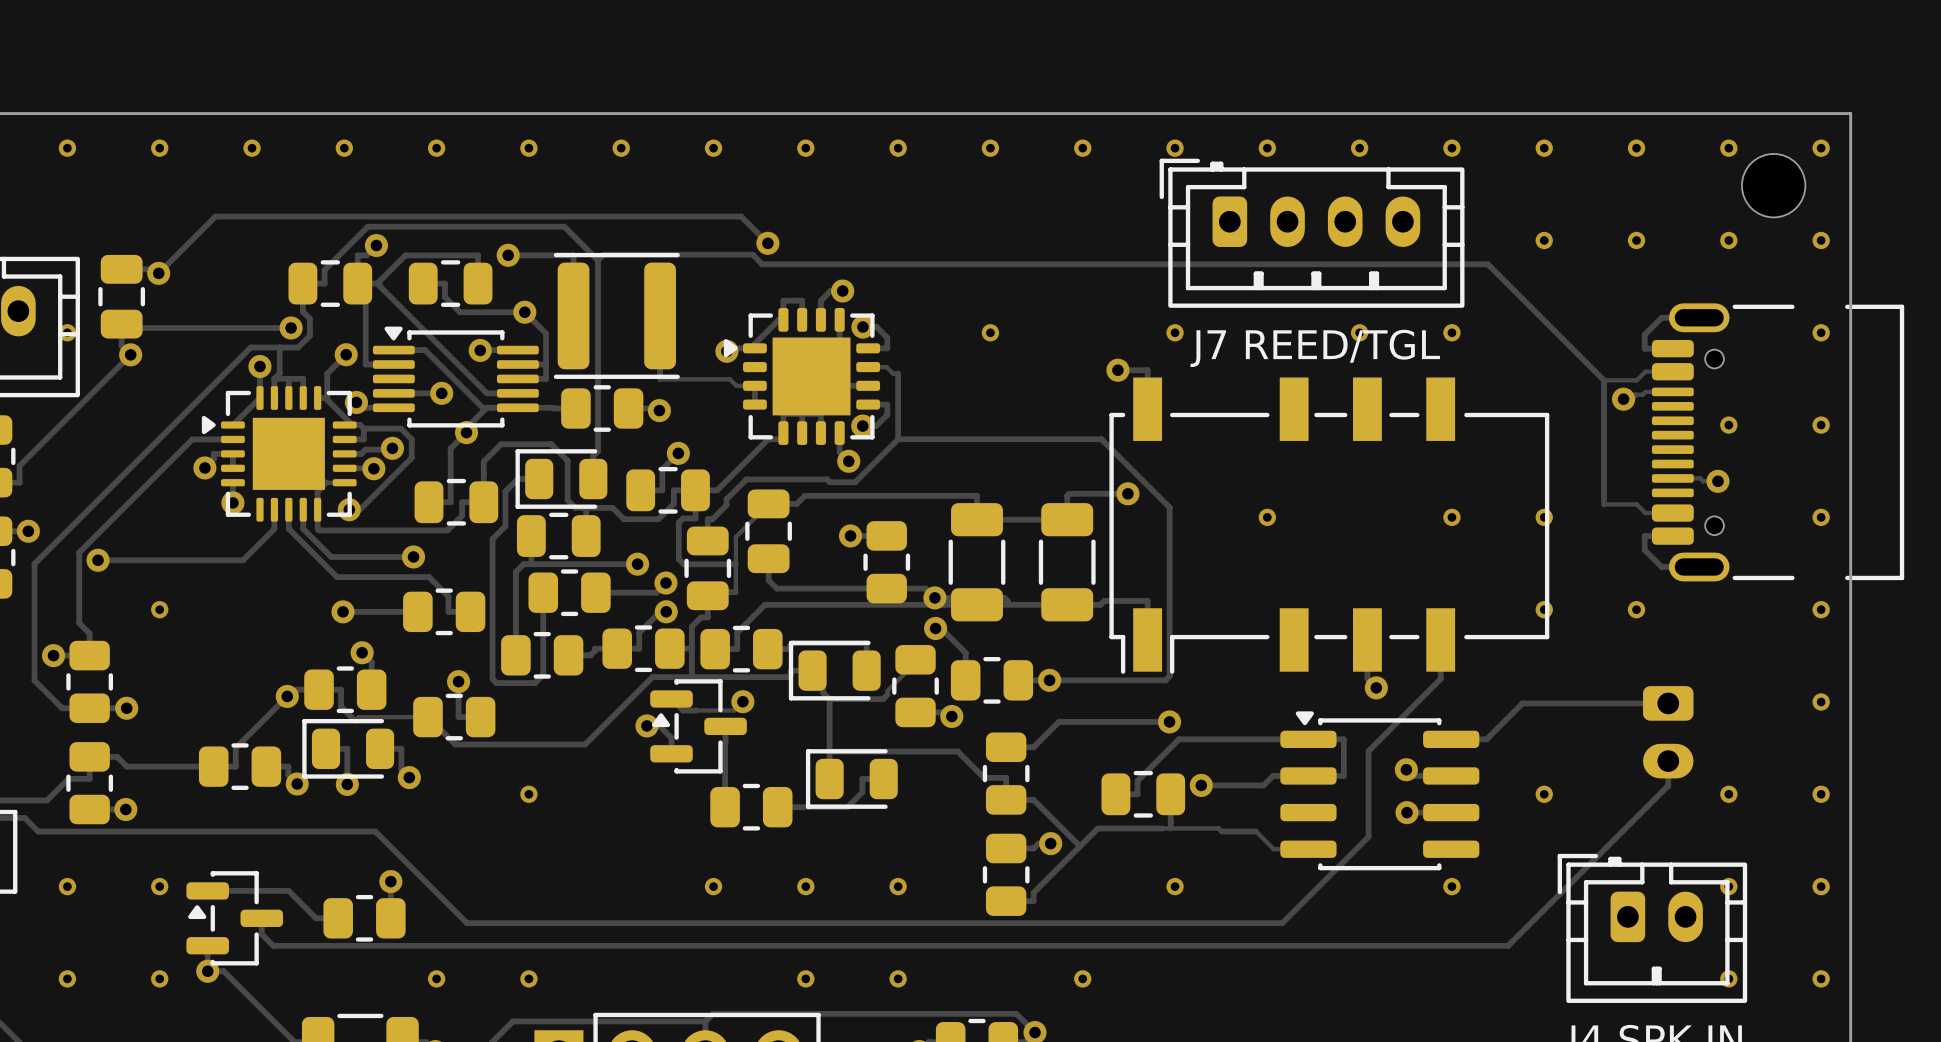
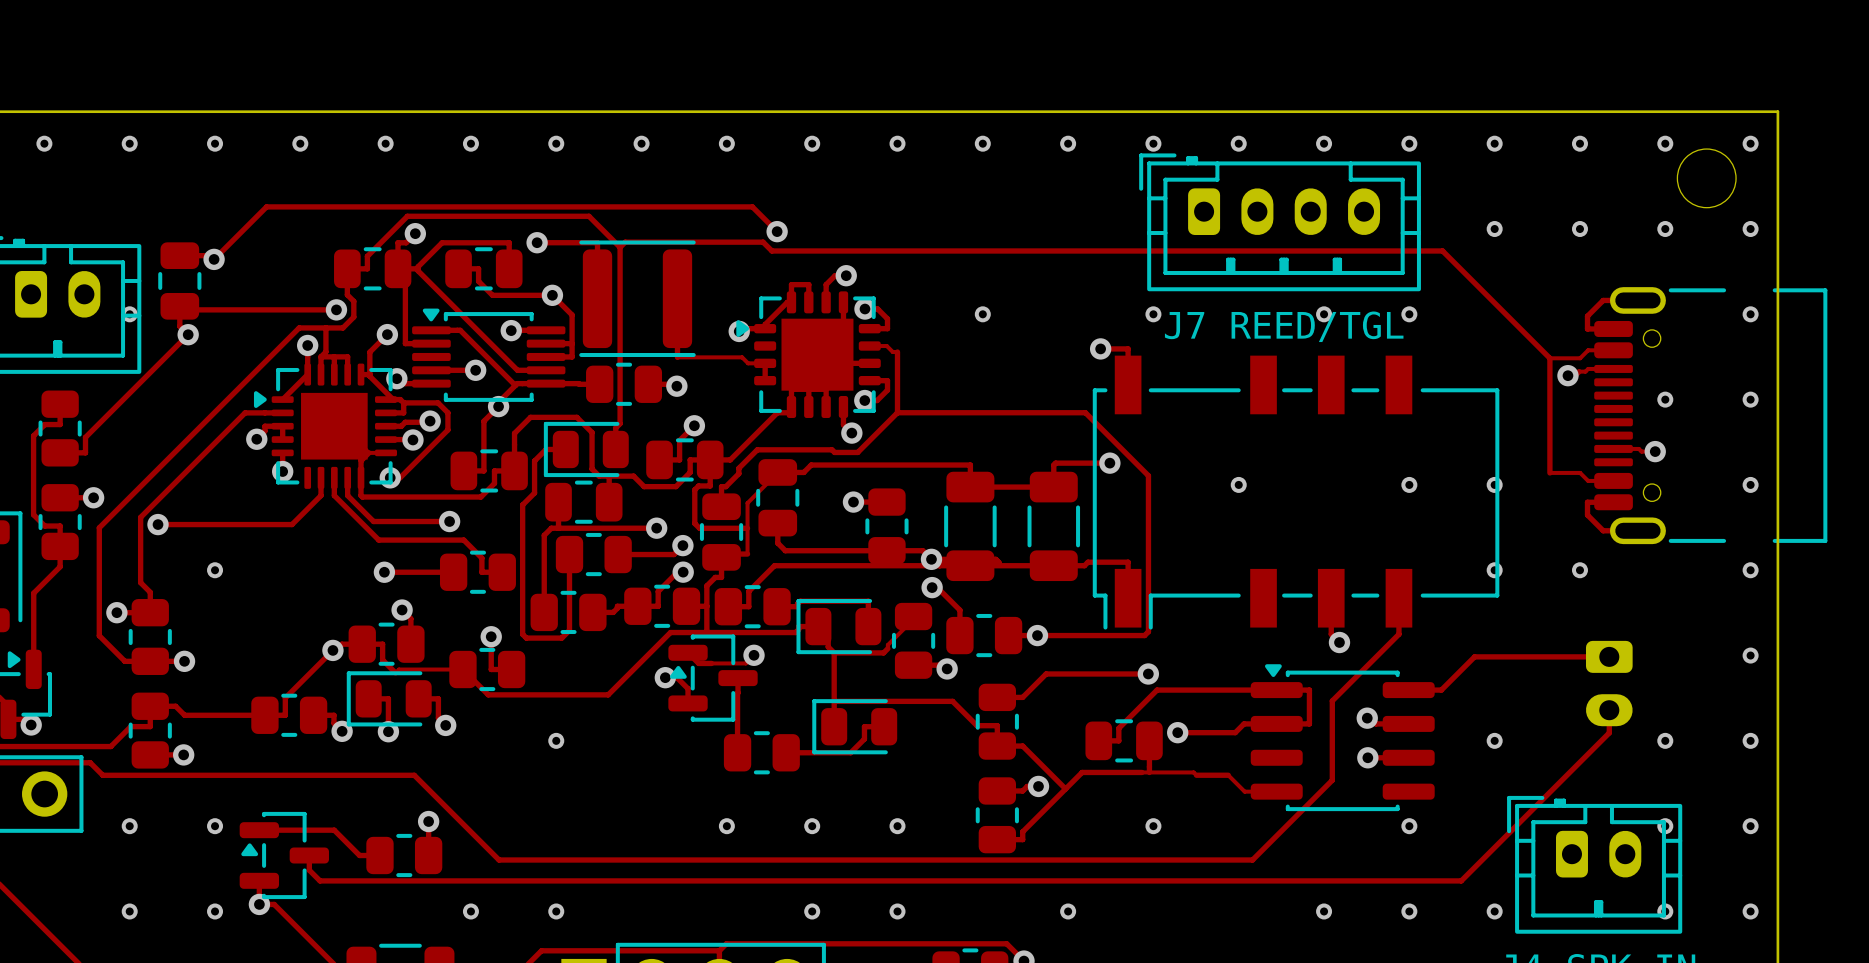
via: none -> (1324, 911)
via: none -> (1409, 911)
via: none -> (1494, 911)

